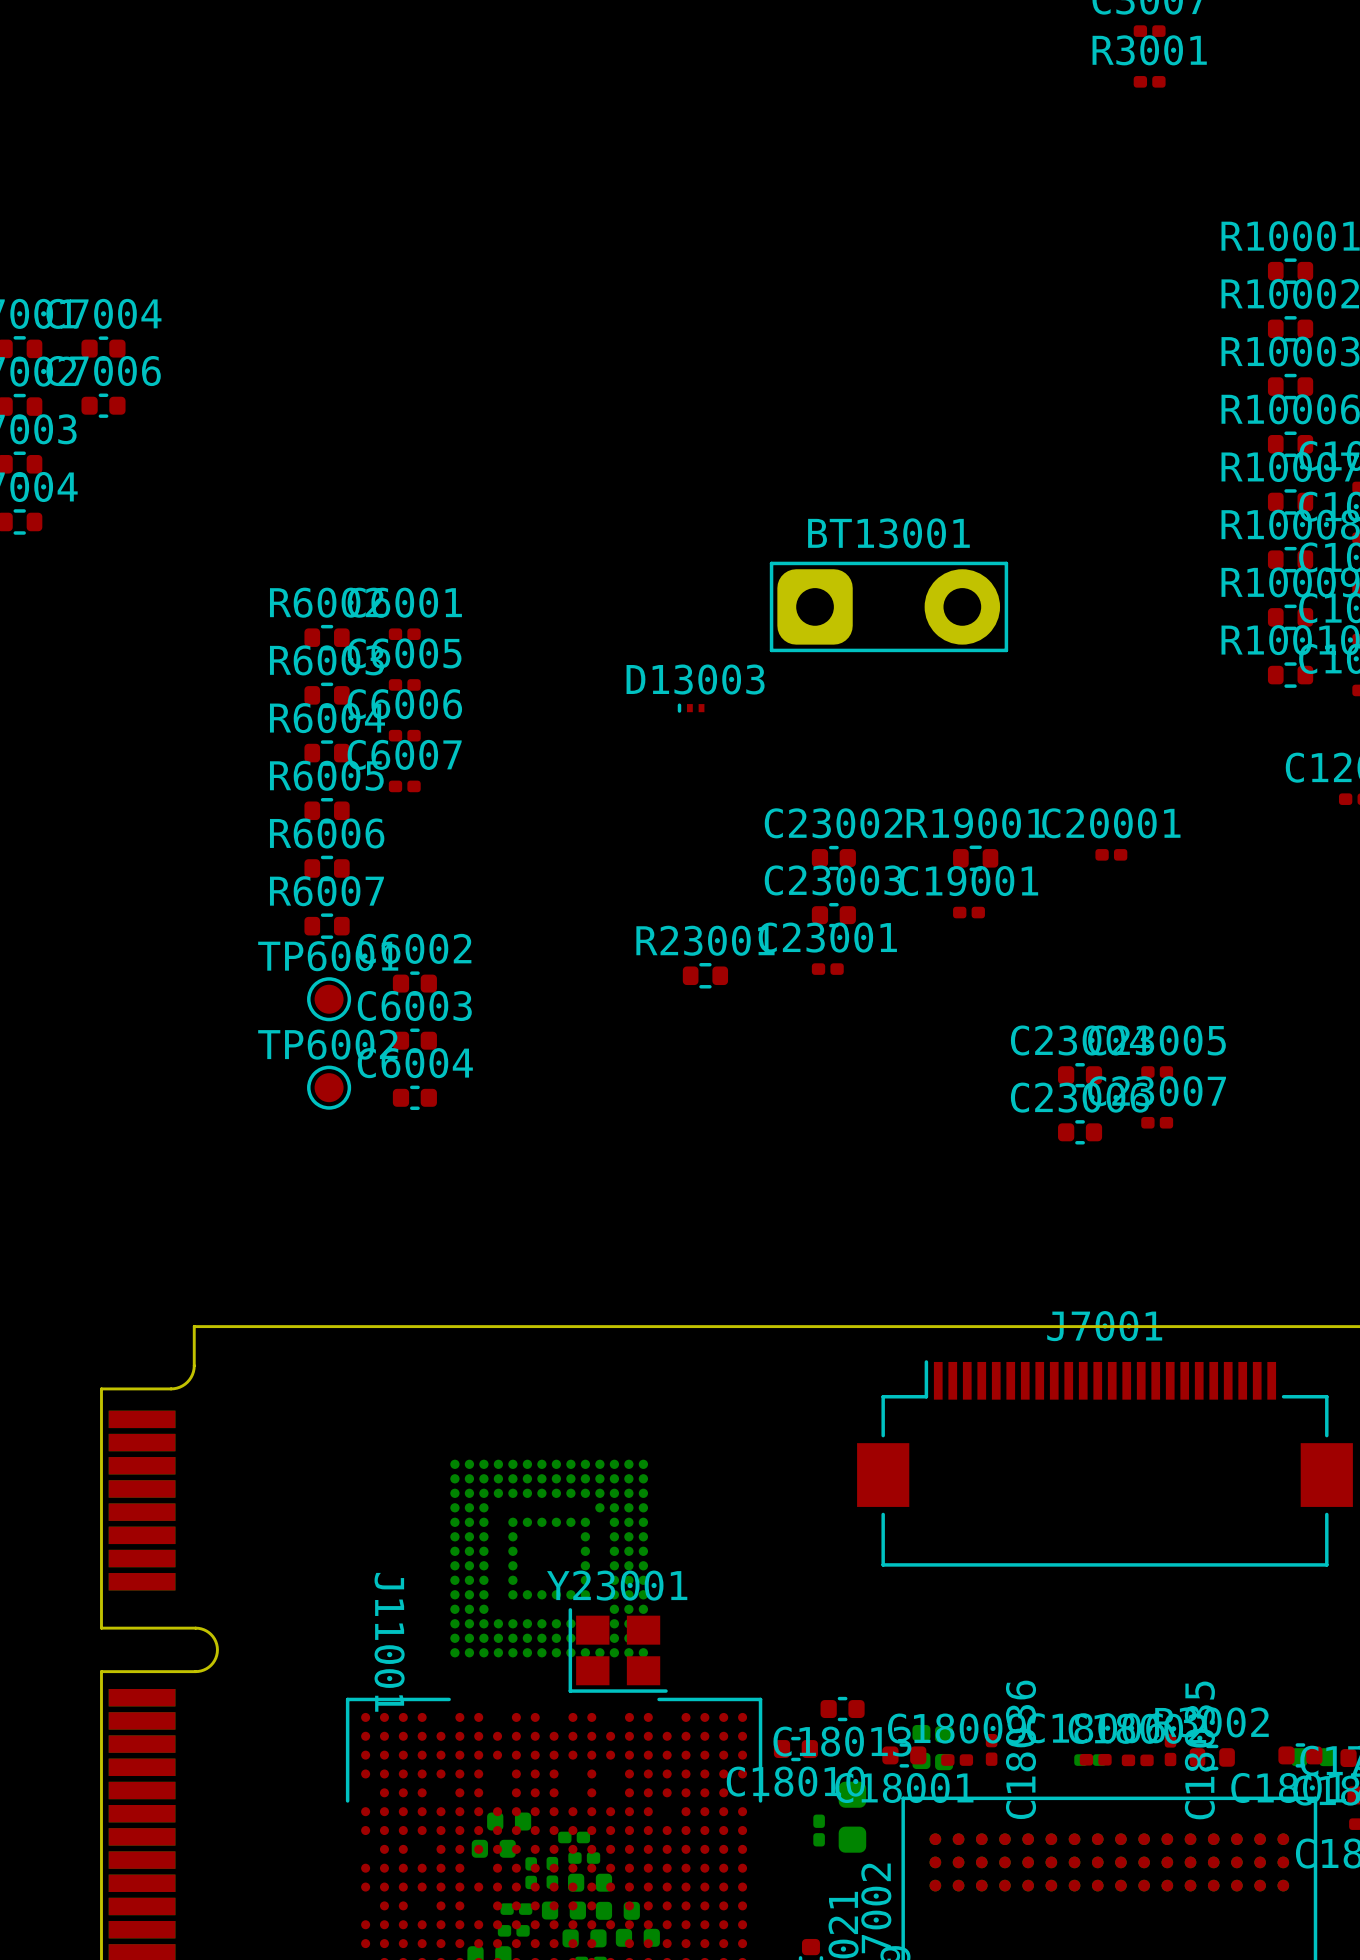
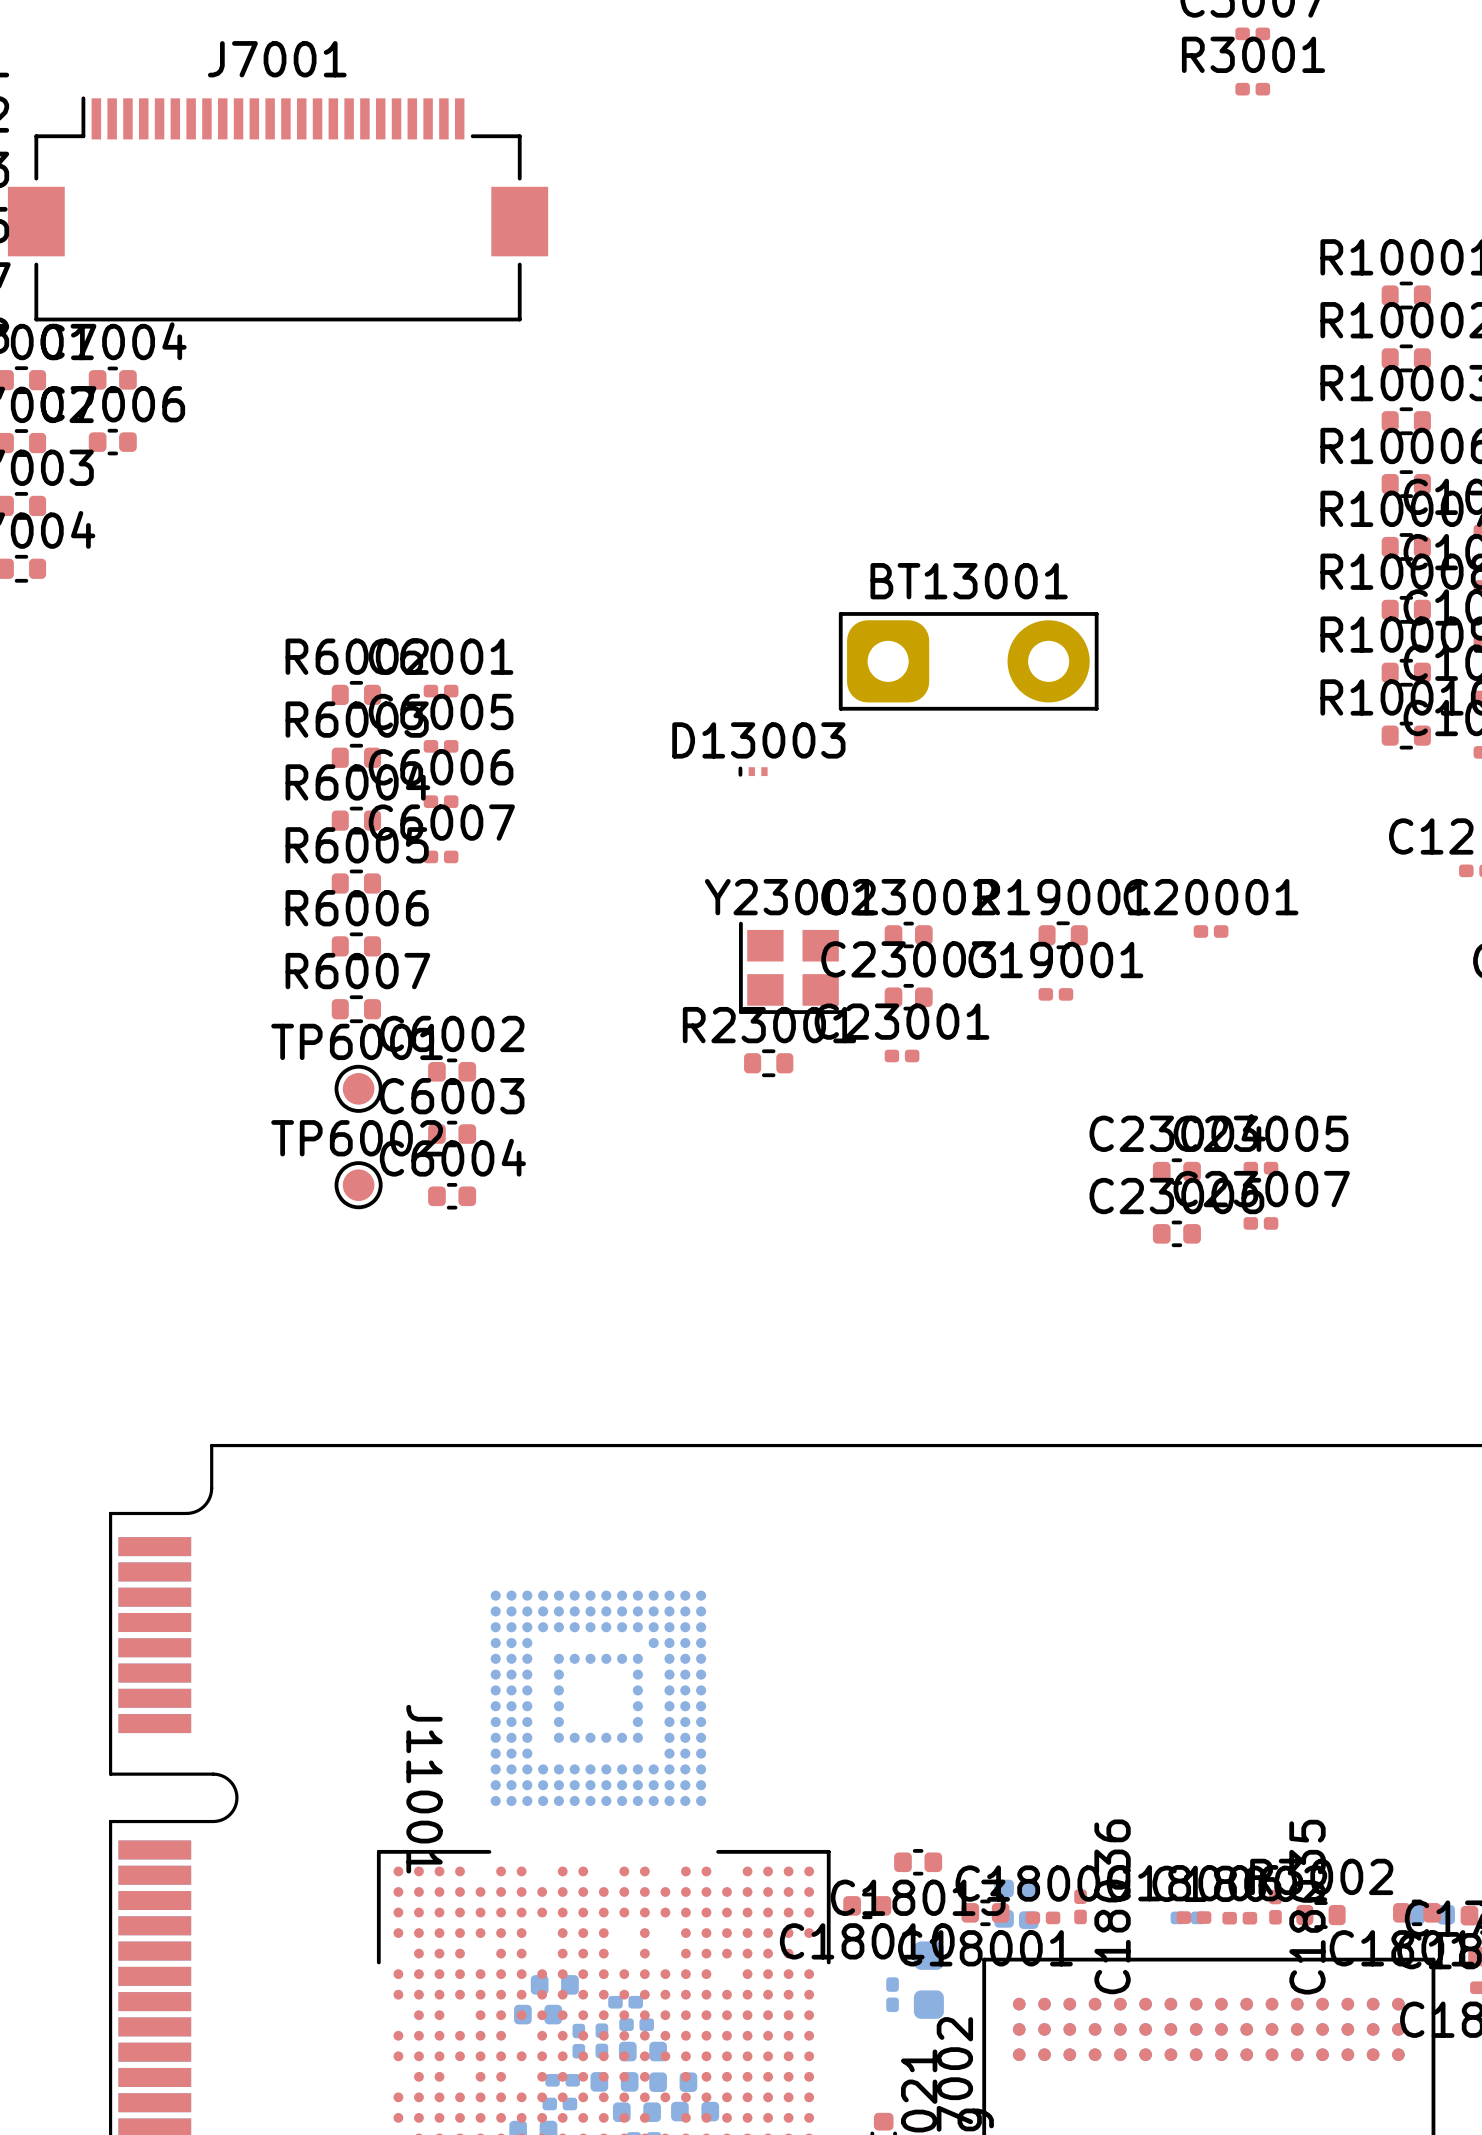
J7001 position: (1104, 1463) -> (278, 208)
Y23001 position: (618, 1650) -> (793, 967)

